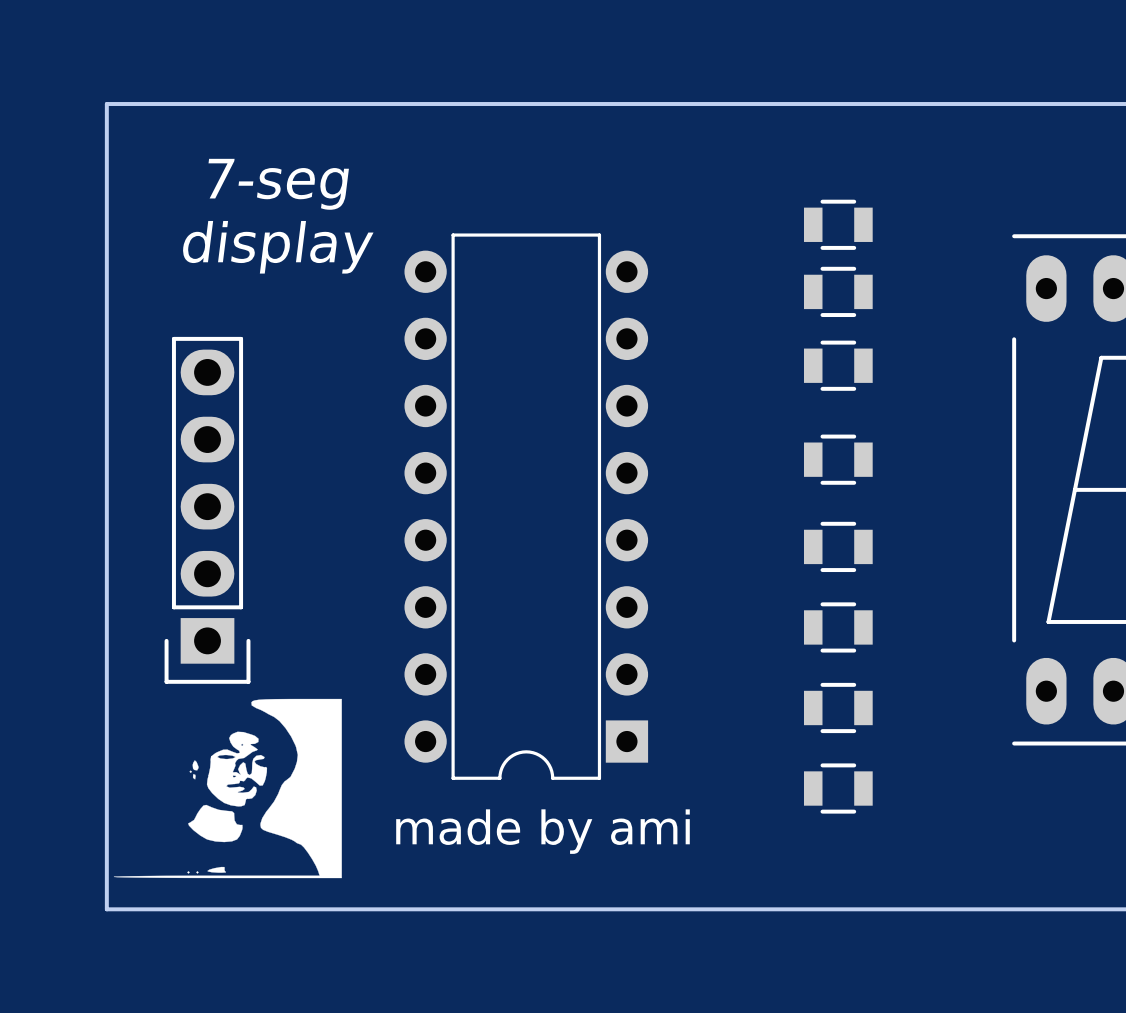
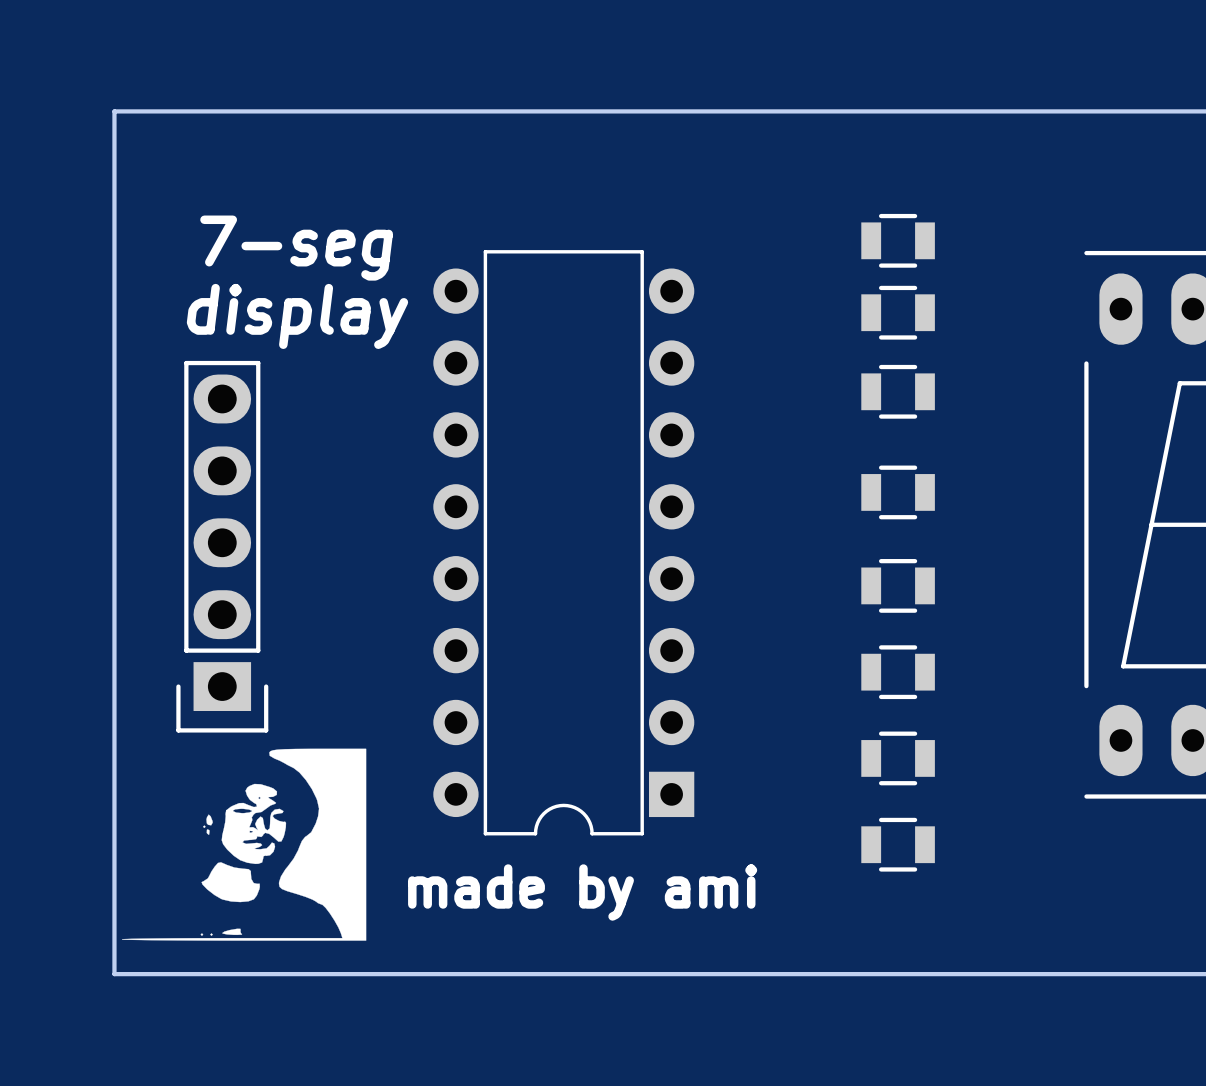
text: 7-seg (278, 184) -> none
text: display (277, 247) -> 7-seg (296, 248)
text: none -> display (297, 316)

